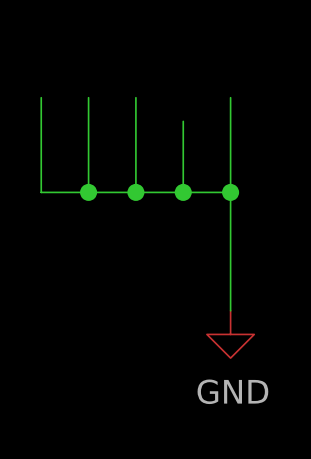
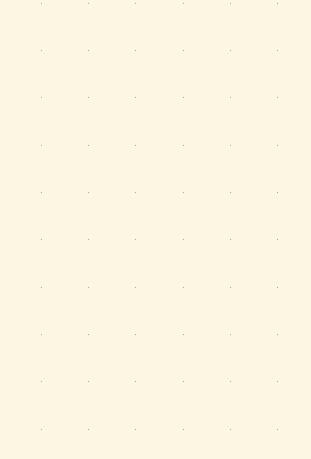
wire: (41, 97) (41, 192) (230, 192) -> none
wire: (88, 97) (88, 192) -> none
wire: (135, 97) (135, 192) -> none
wire: (230, 97) (230, 310) -> none
wire: (183, 121) (183, 192) -> none
junction: (88, 192) -> none
junction: (135, 192) -> none
junction: (183, 192) -> none
junction: (230, 192) -> none
power symbol: GND (230, 334) -> none

